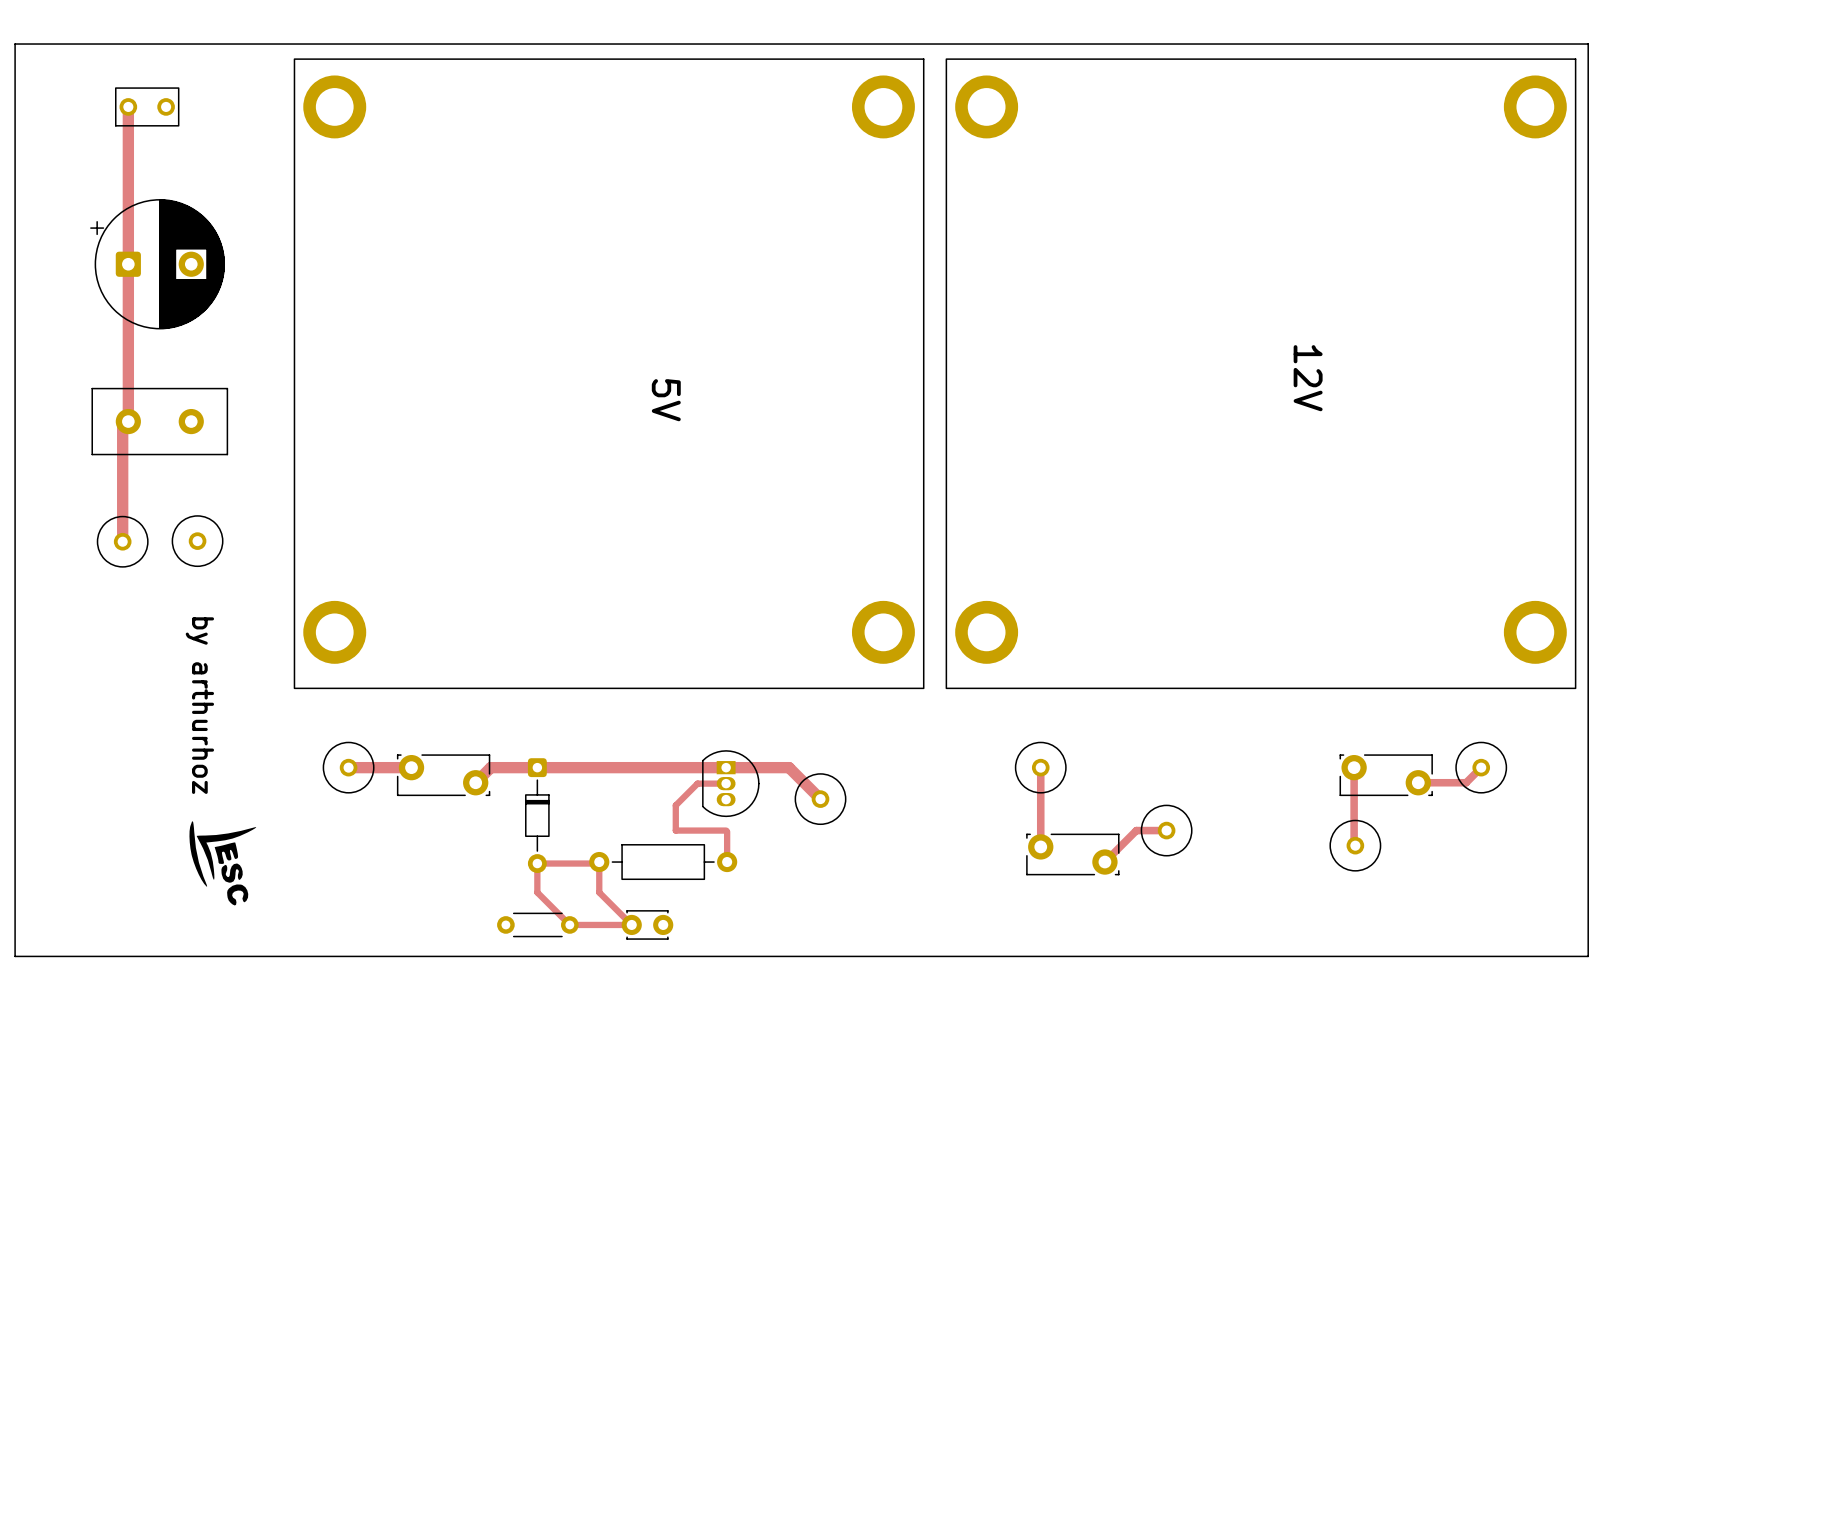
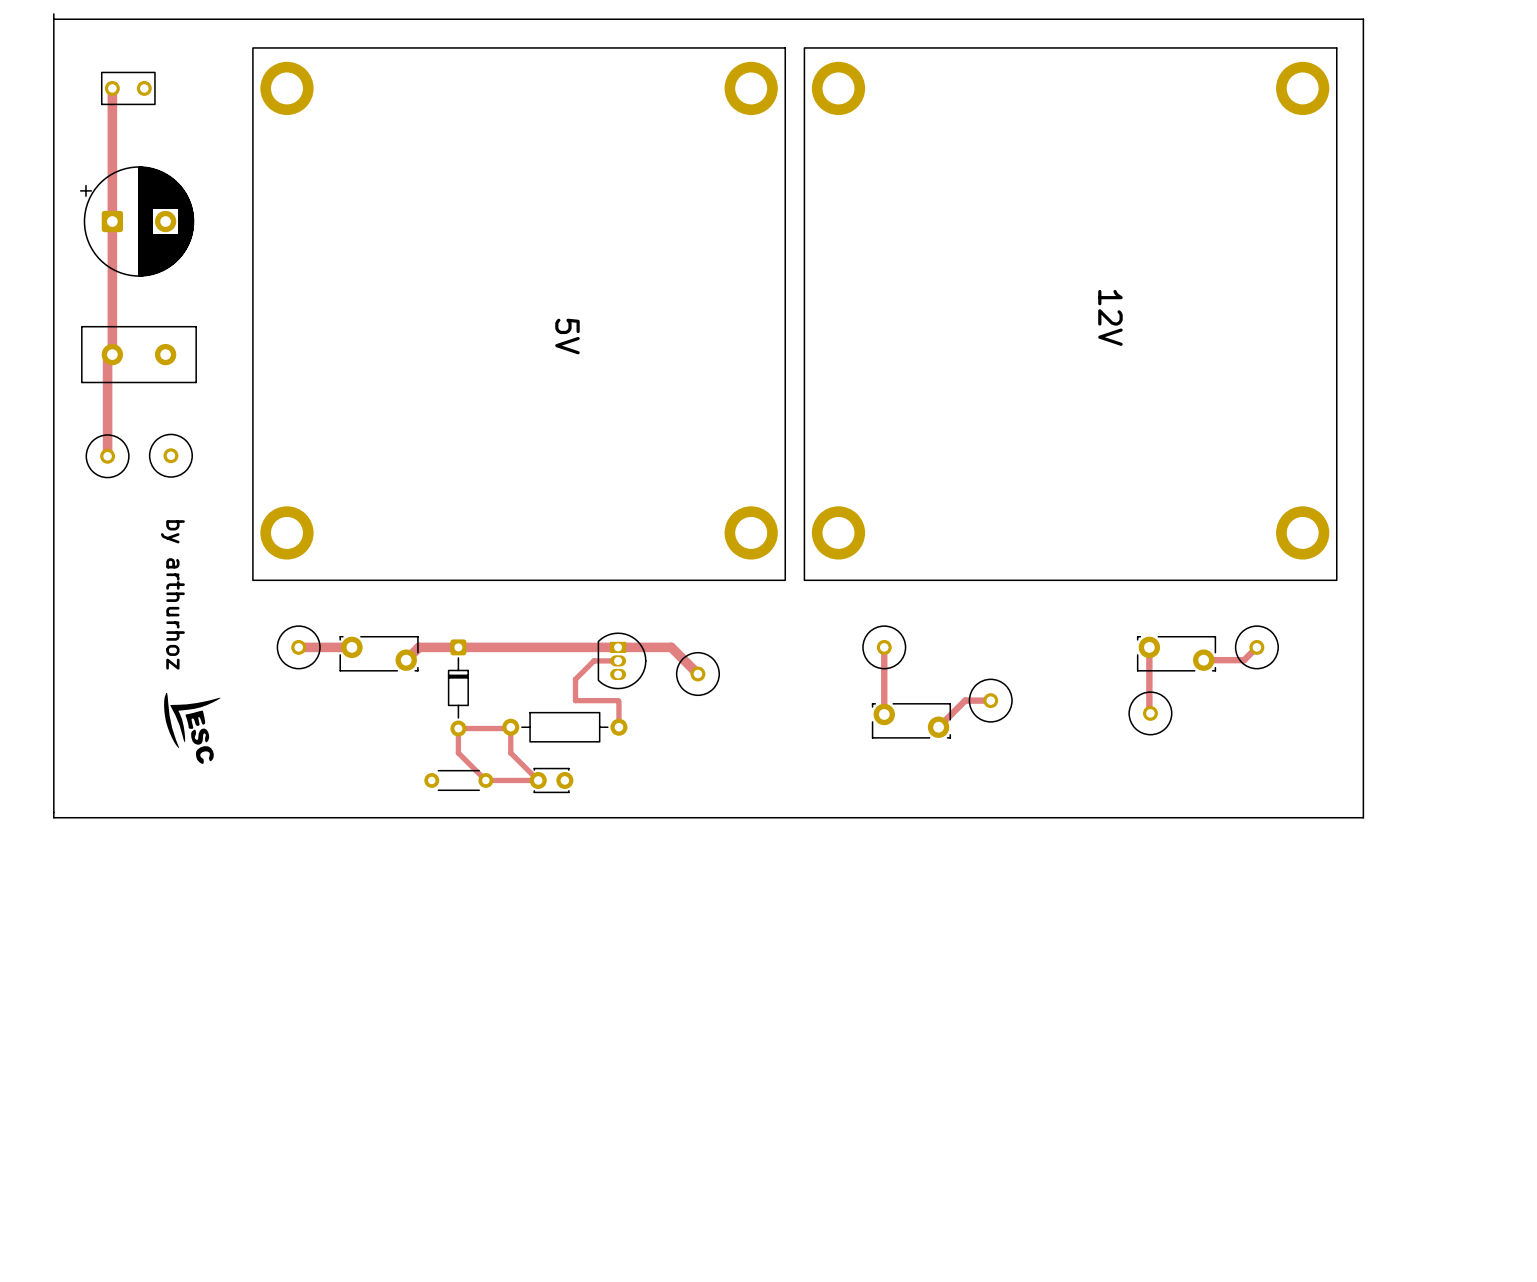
board edge: none -> (53, 13) (53, 817) (1363, 817) (1363, 19) (53, 19)
board edge: (15, 44) (1588, 44) (1588, 956) (15, 956) (15, 44) -> none

